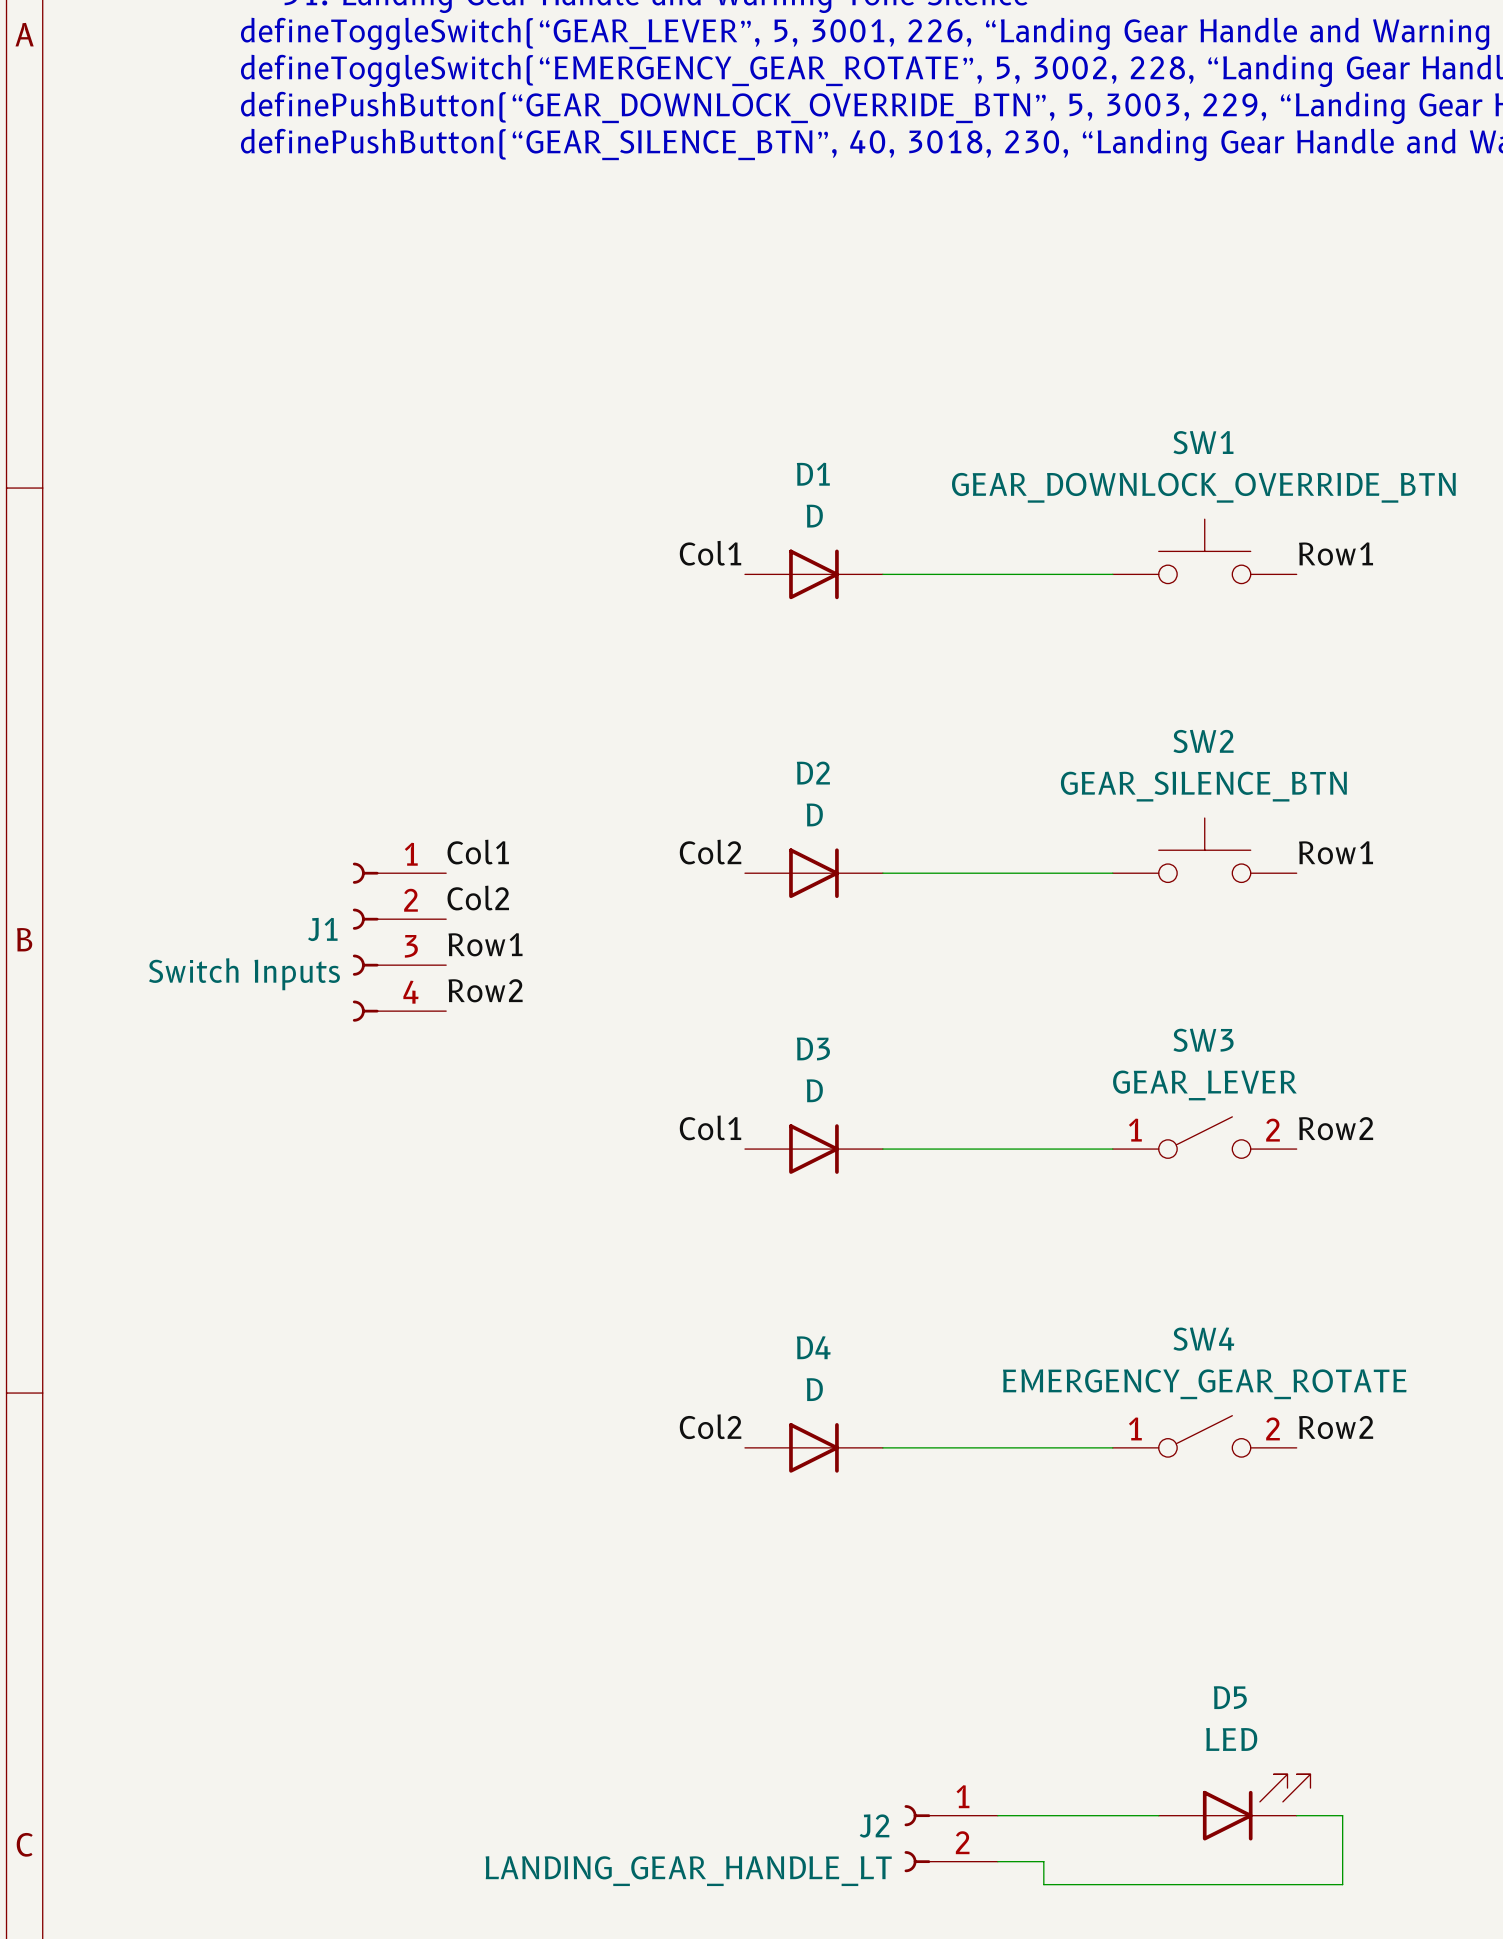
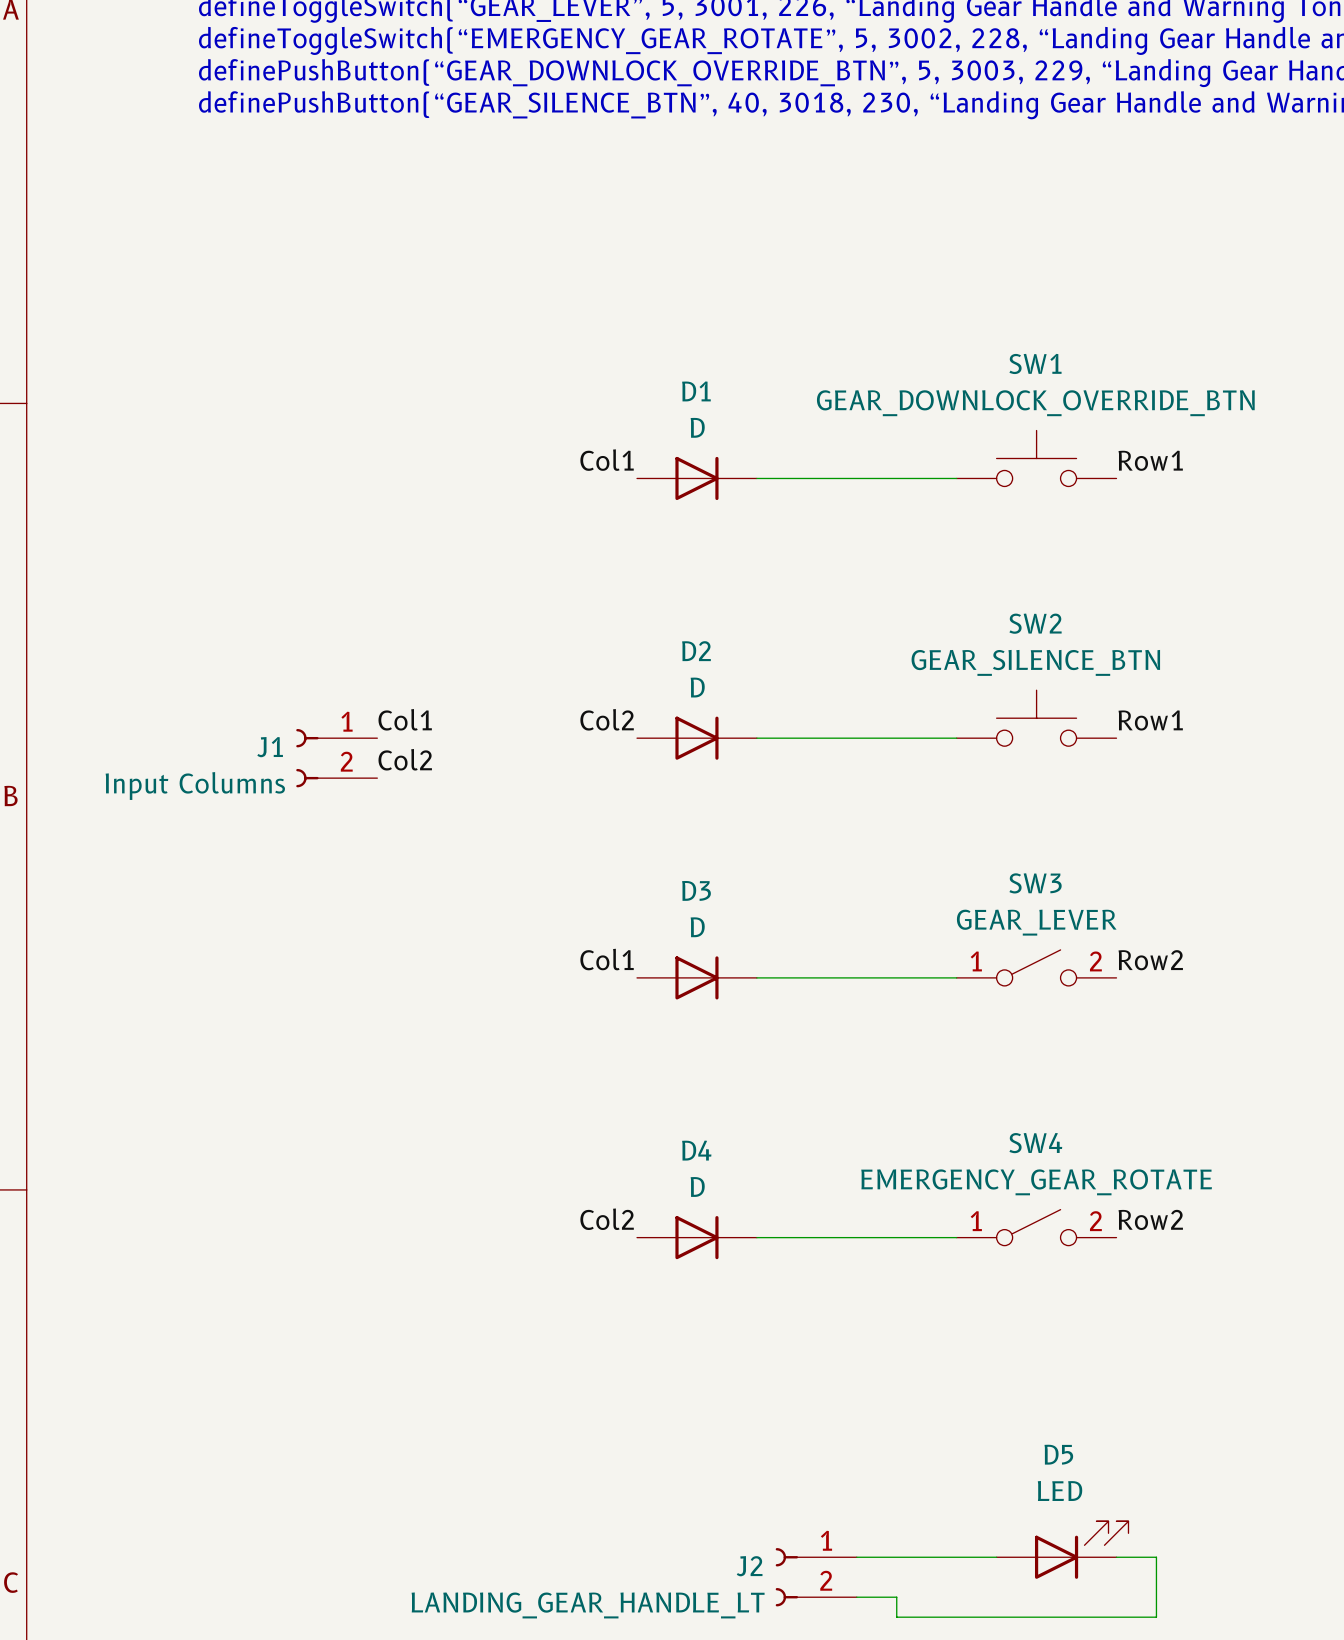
J1 symbol: [352, 862, 447, 1022] -> [296, 728, 378, 788]
label: Row1 (485, 944) -> none
J1 value: Switch Inputs (244, 974) -> Input Columns (195, 786)
label: Row2 (485, 990) -> none

